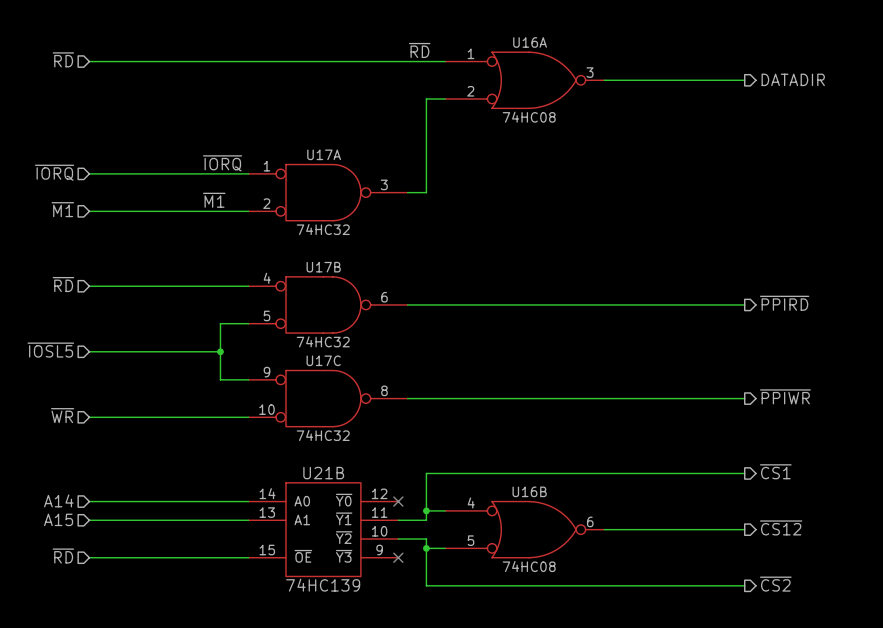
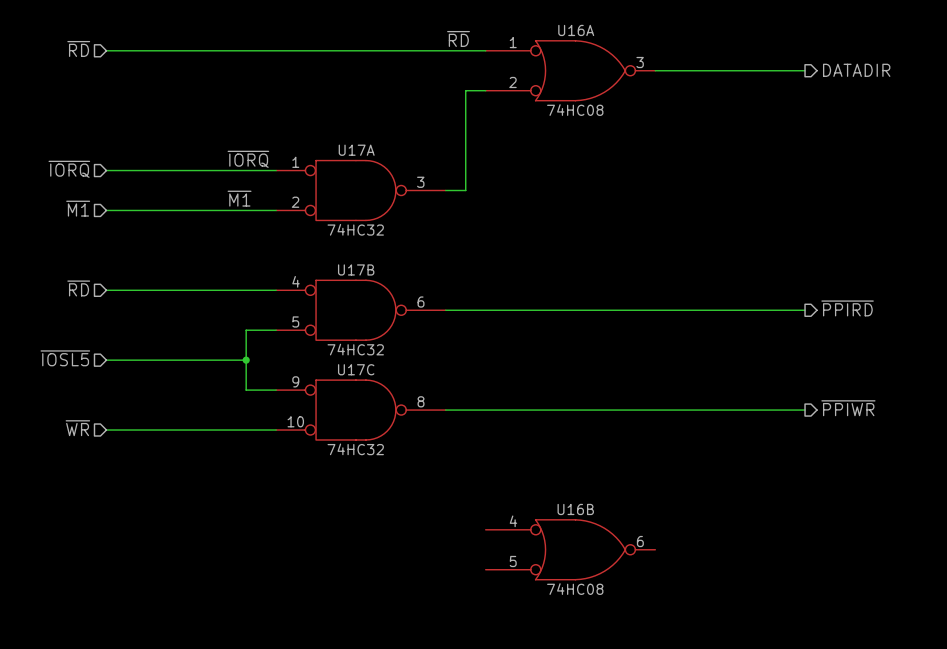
hierarchical label: ~{CS1} (775, 471) -> none
wire: (744, 473) (426, 473) (426, 520) (398, 520) -> none
hierarchical label: A14 (58, 500) -> none
wire: (89, 501) (248, 501) -> none
no-connect mark: (398, 501) -> none
wire: (426, 510) (445, 510) -> none
junction: (426, 510) -> none
hierarchical label: A15 (58, 519) -> none
wire: (89, 520) (248, 520) -> none
hierarchical label: ~{CS12} (781, 527) -> none
U21B: 74HC139 (323, 529) -> none
wire: (604, 529) (744, 529) -> none
wire: (398, 539) (426, 539) (426, 585) (744, 585) -> none
wire: (426, 548) (445, 548) -> none
junction: (426, 548) -> none
hierarchical label: ~{RD} (63, 556) -> none
wire: (89, 557) (248, 557) -> none
no-connect mark: (398, 557) -> none
hierarchical label: ~{CS2} (775, 584) -> none

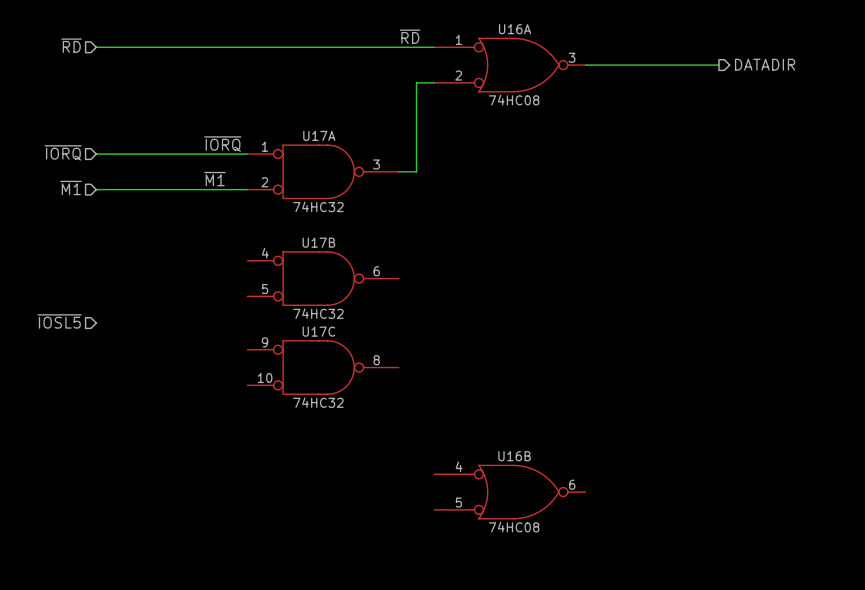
hierarchical label: ~{RD} (78, 288) -> none
wire: (106, 290) (276, 290) -> none
hierarchical label: ~{PPIRD} (847, 308) -> none
wire: (445, 310) (805, 310) -> none
wire: (276, 330) (246, 330) (246, 390) (276, 390) -> none
wire: (106, 360) (246, 360) -> none
junction: (246, 360) -> none
hierarchical label: ~{PPIWR} (848, 408) -> none
wire: (445, 410) (805, 410) -> none
hierarchical label: ~{WR} (77, 428) -> none
wire: (106, 430) (276, 430) -> none

